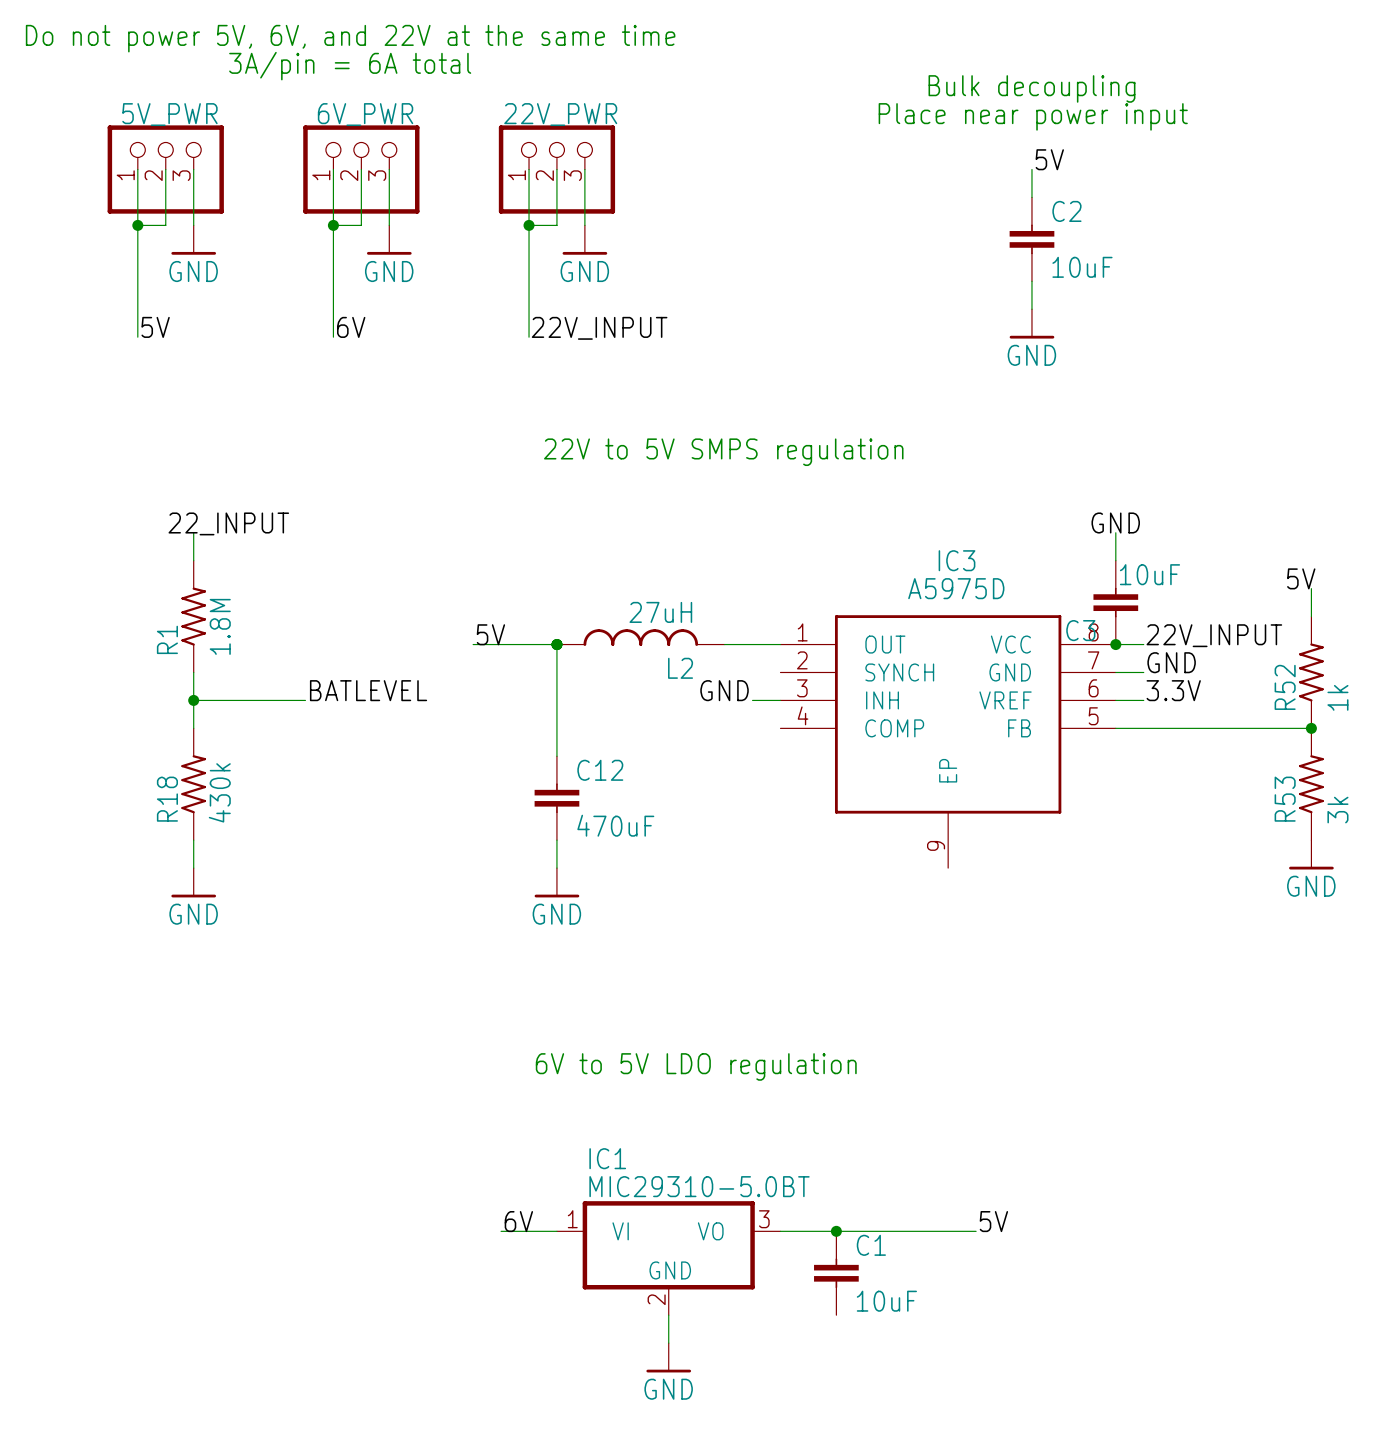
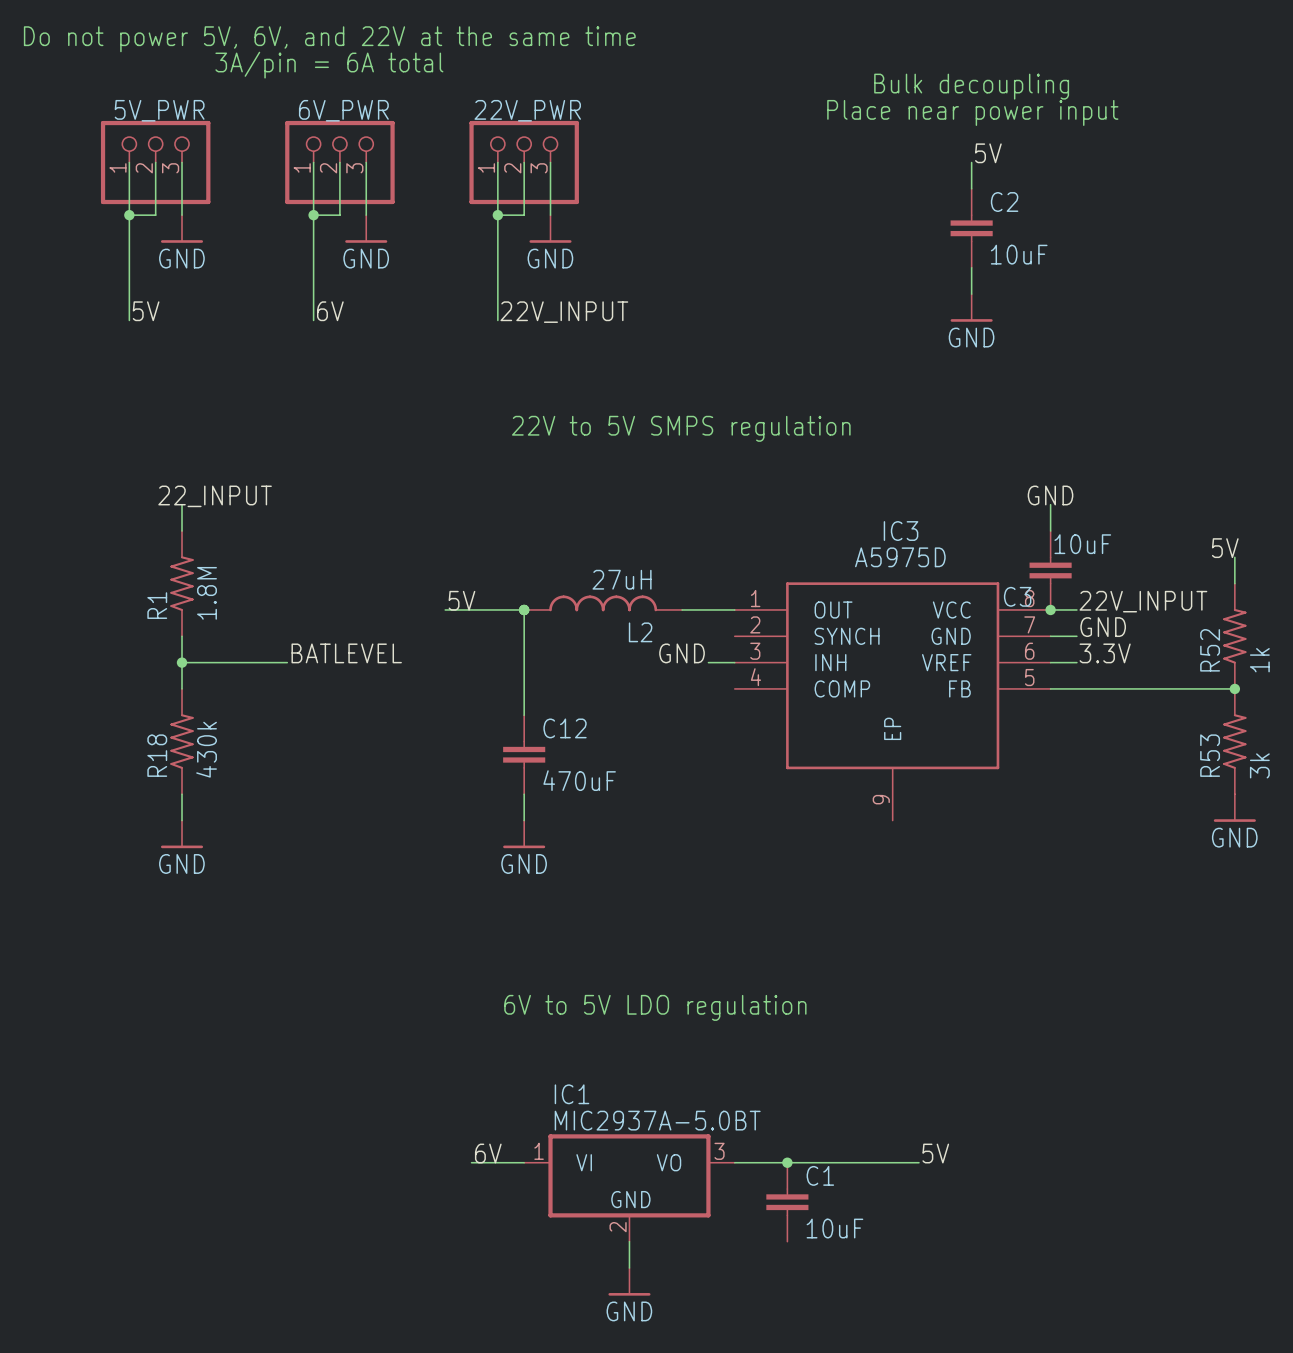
IC1 value: MIC29310-5.0BT (699, 1186) -> MIC2937A-5.0BT (657, 1120)

